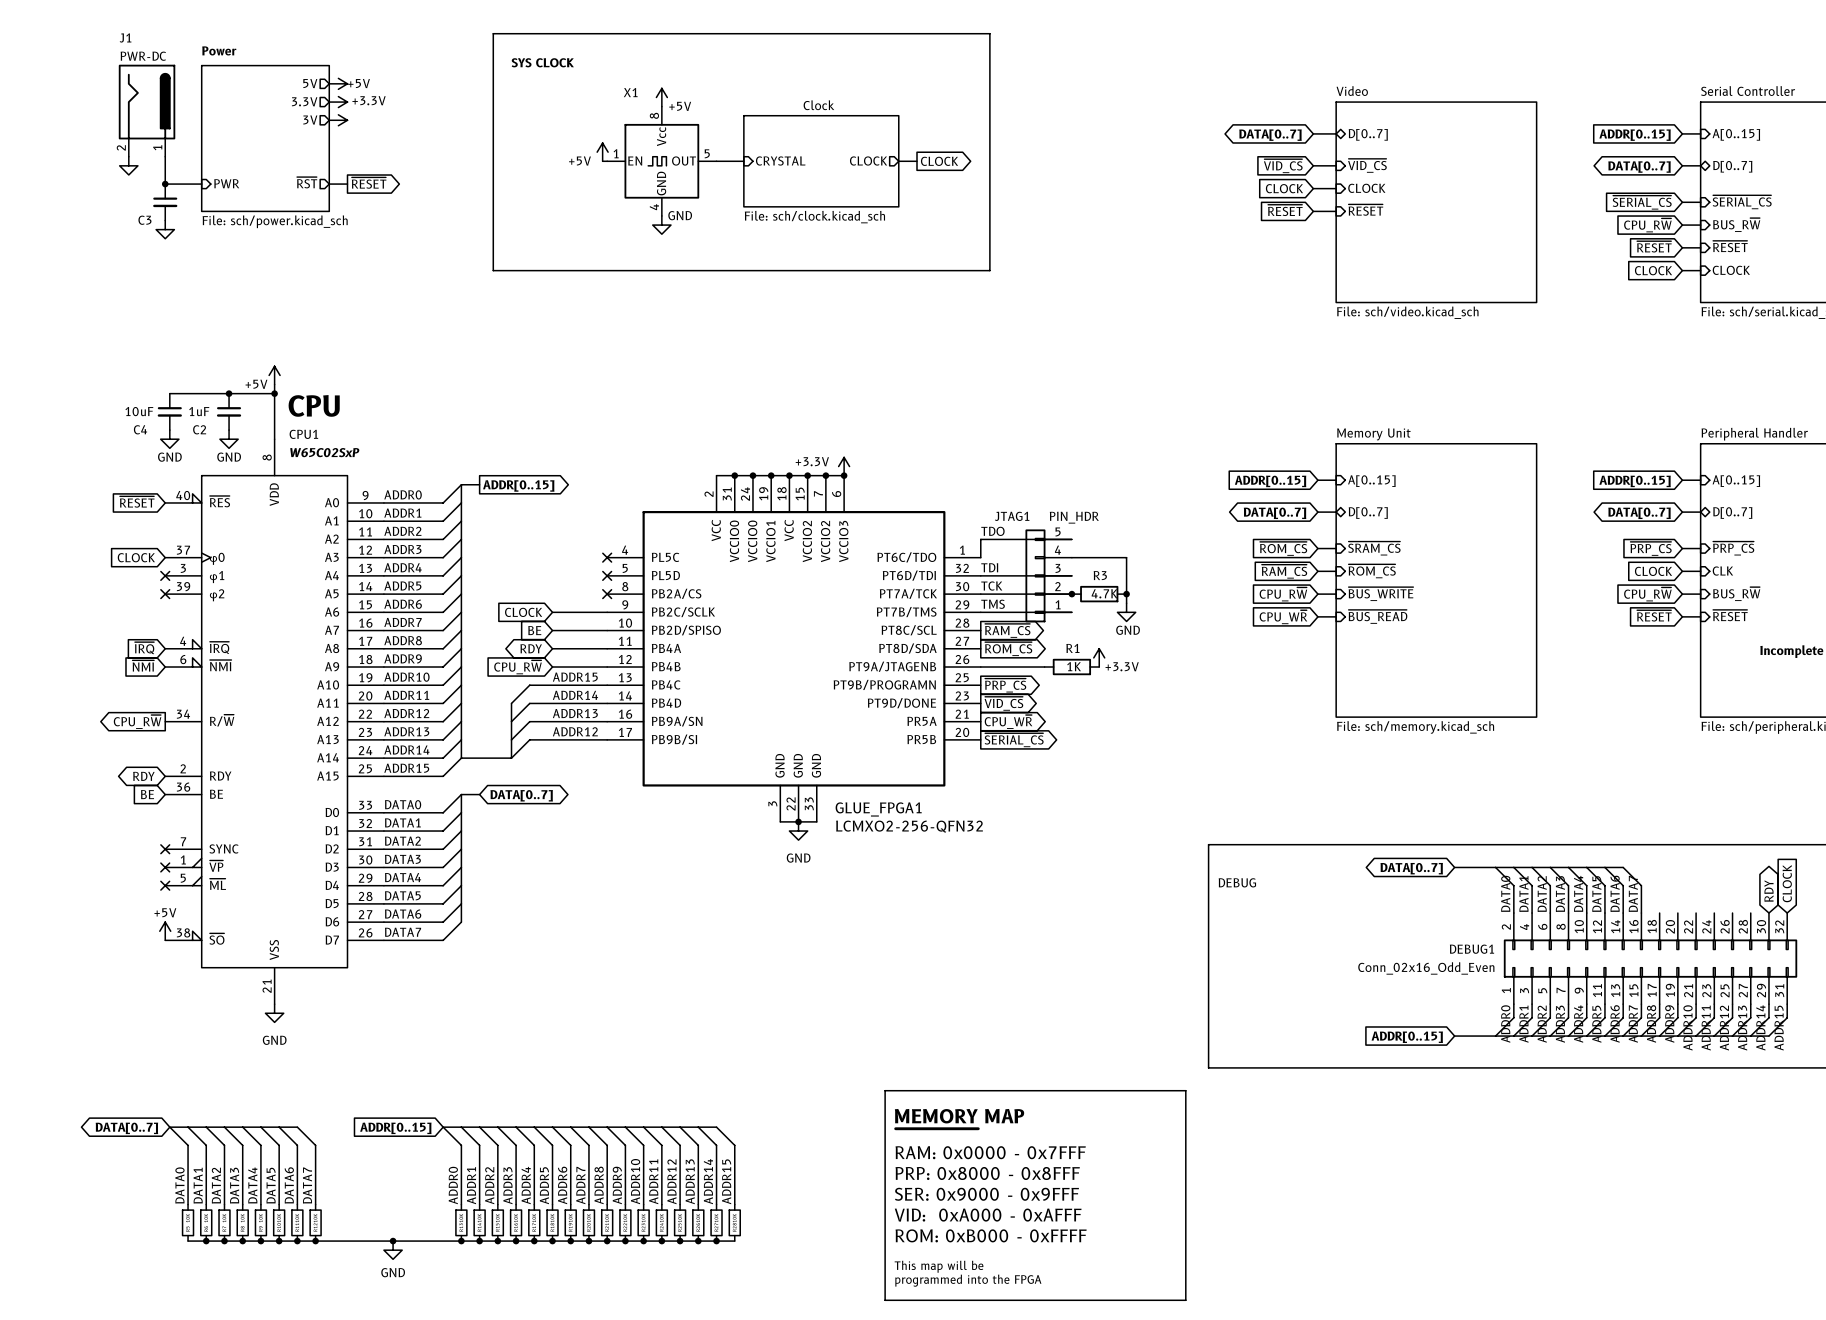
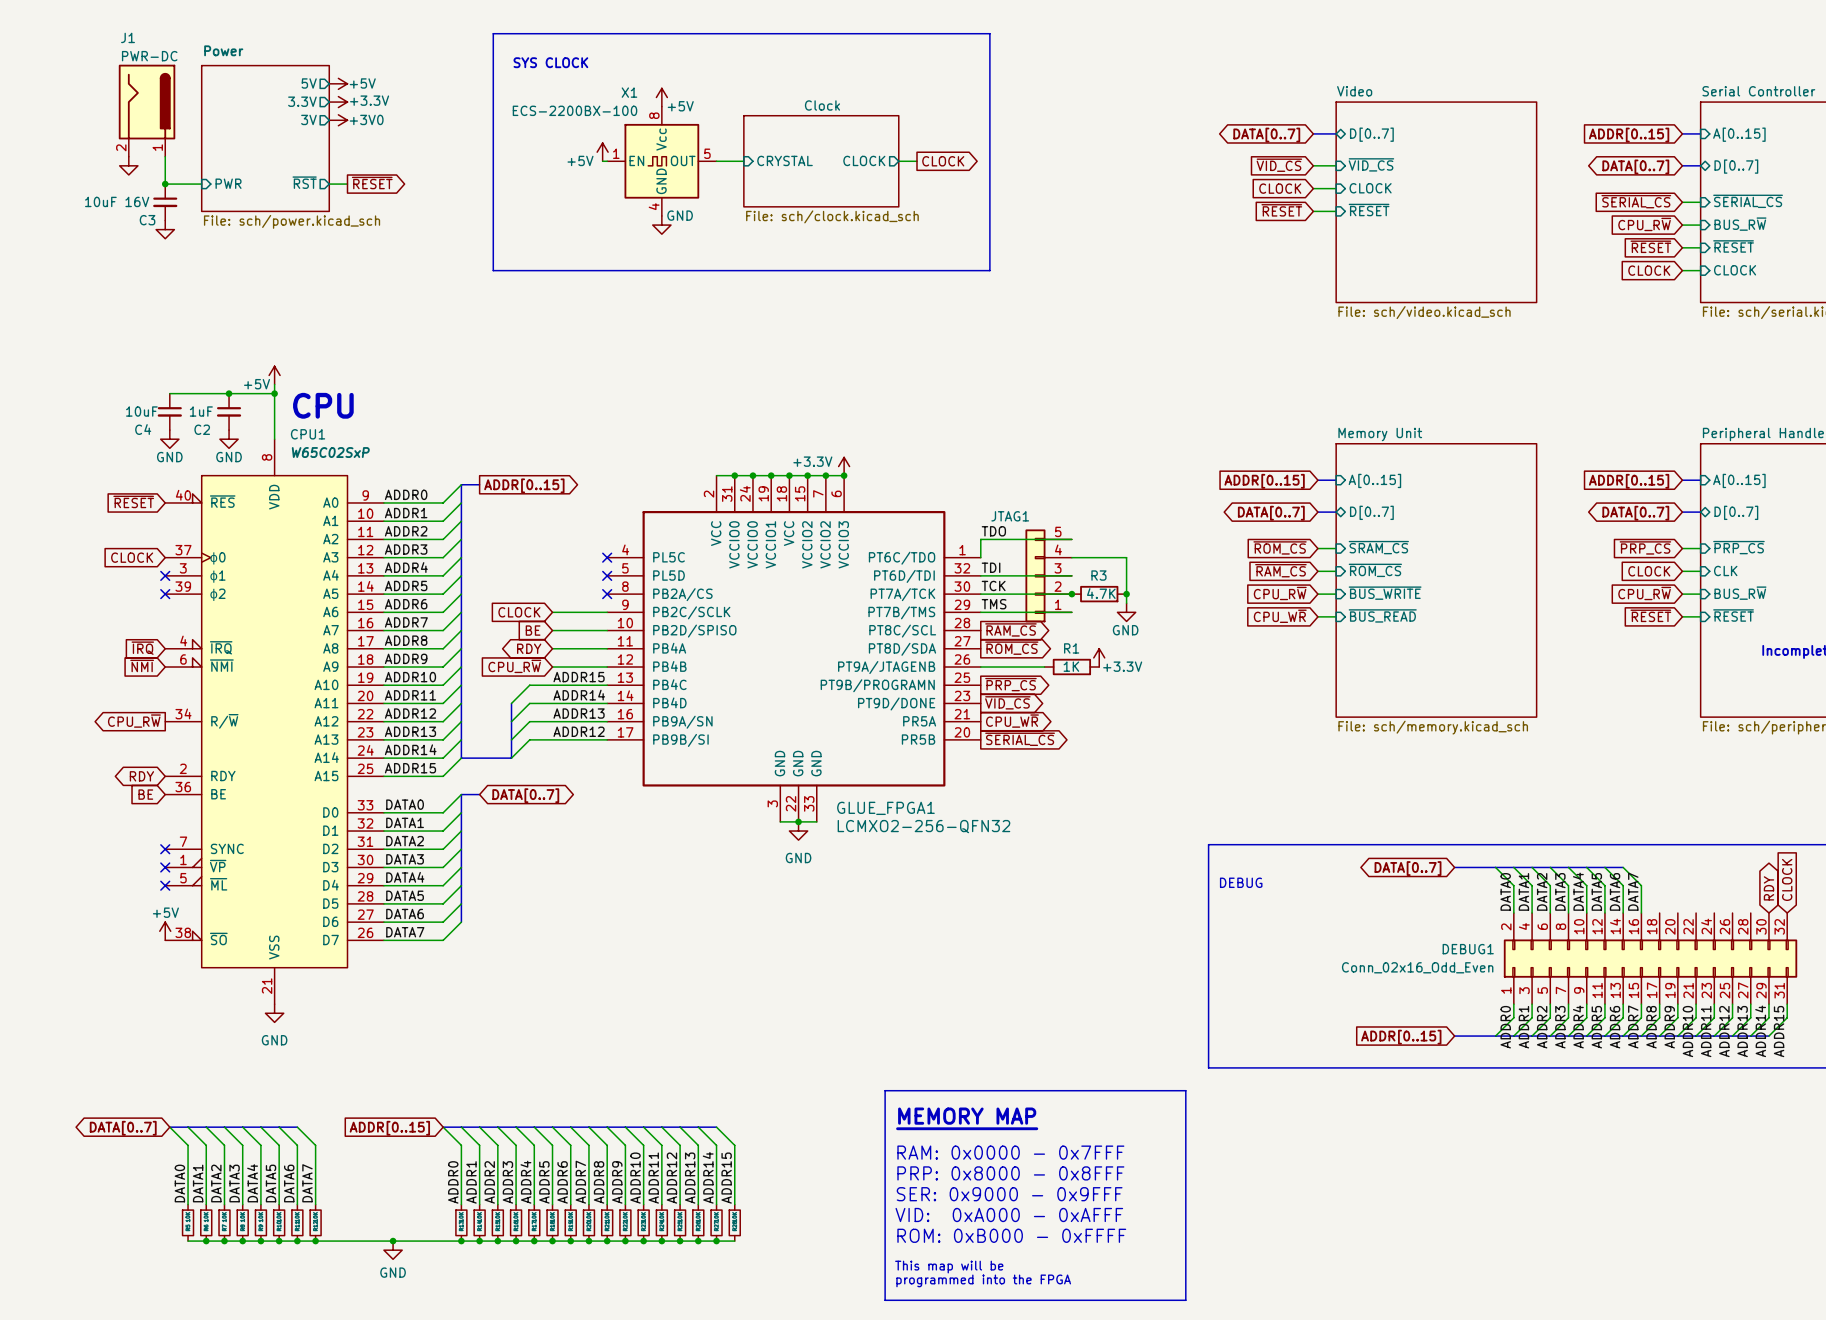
X1 value: none -> ECS-2200BX-100 (575, 110)
power symbol text: none -> +3V0 (366, 119)
C3 value: none -> 10uF 16V (117, 201)
JTAG1 value: PIN_HDR (1074, 517) -> none

